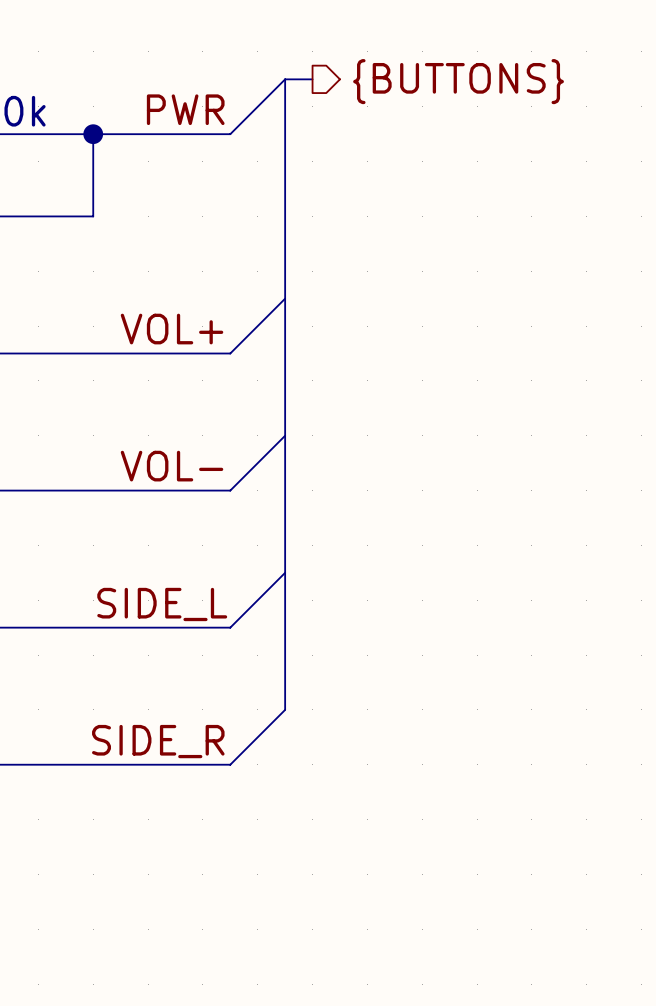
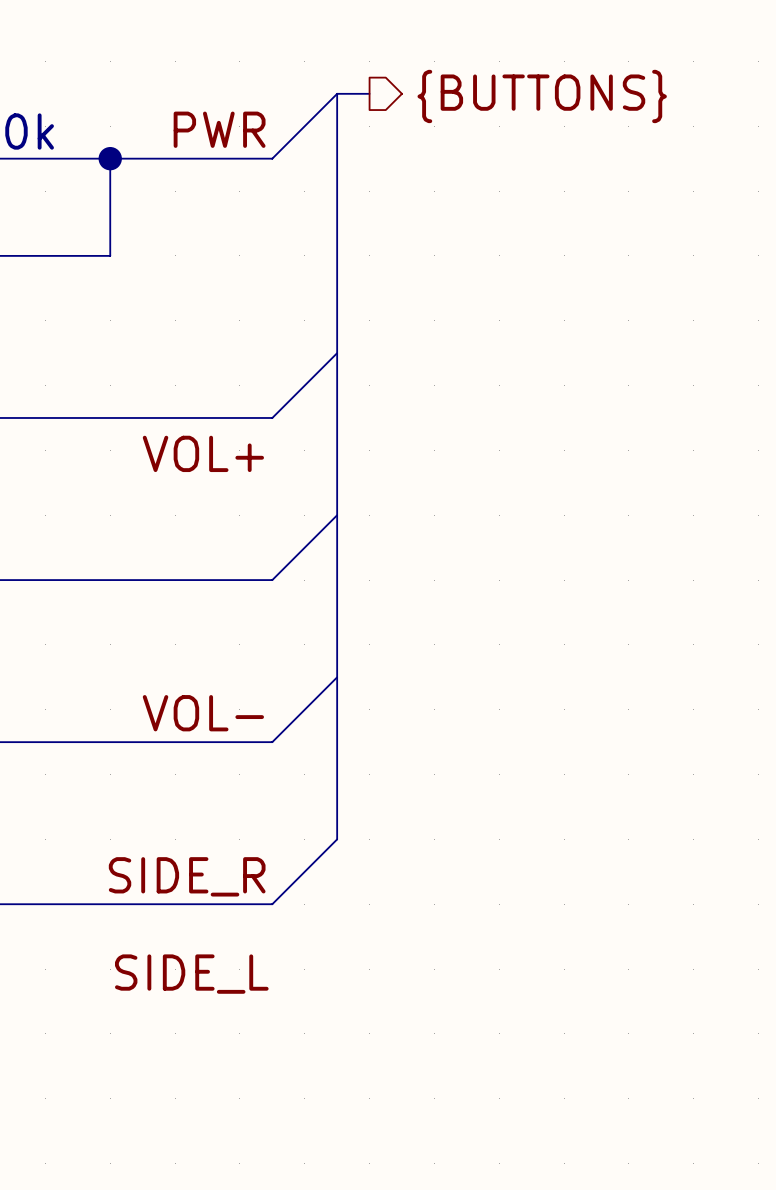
label position: VOL+ (172, 329) -> VOL+ (203, 453)
label: VOL- (172, 466) -> none
label: SIDE_L (162, 604) -> VOL- (203, 713)
label: none -> SIDE_L (191, 974)

